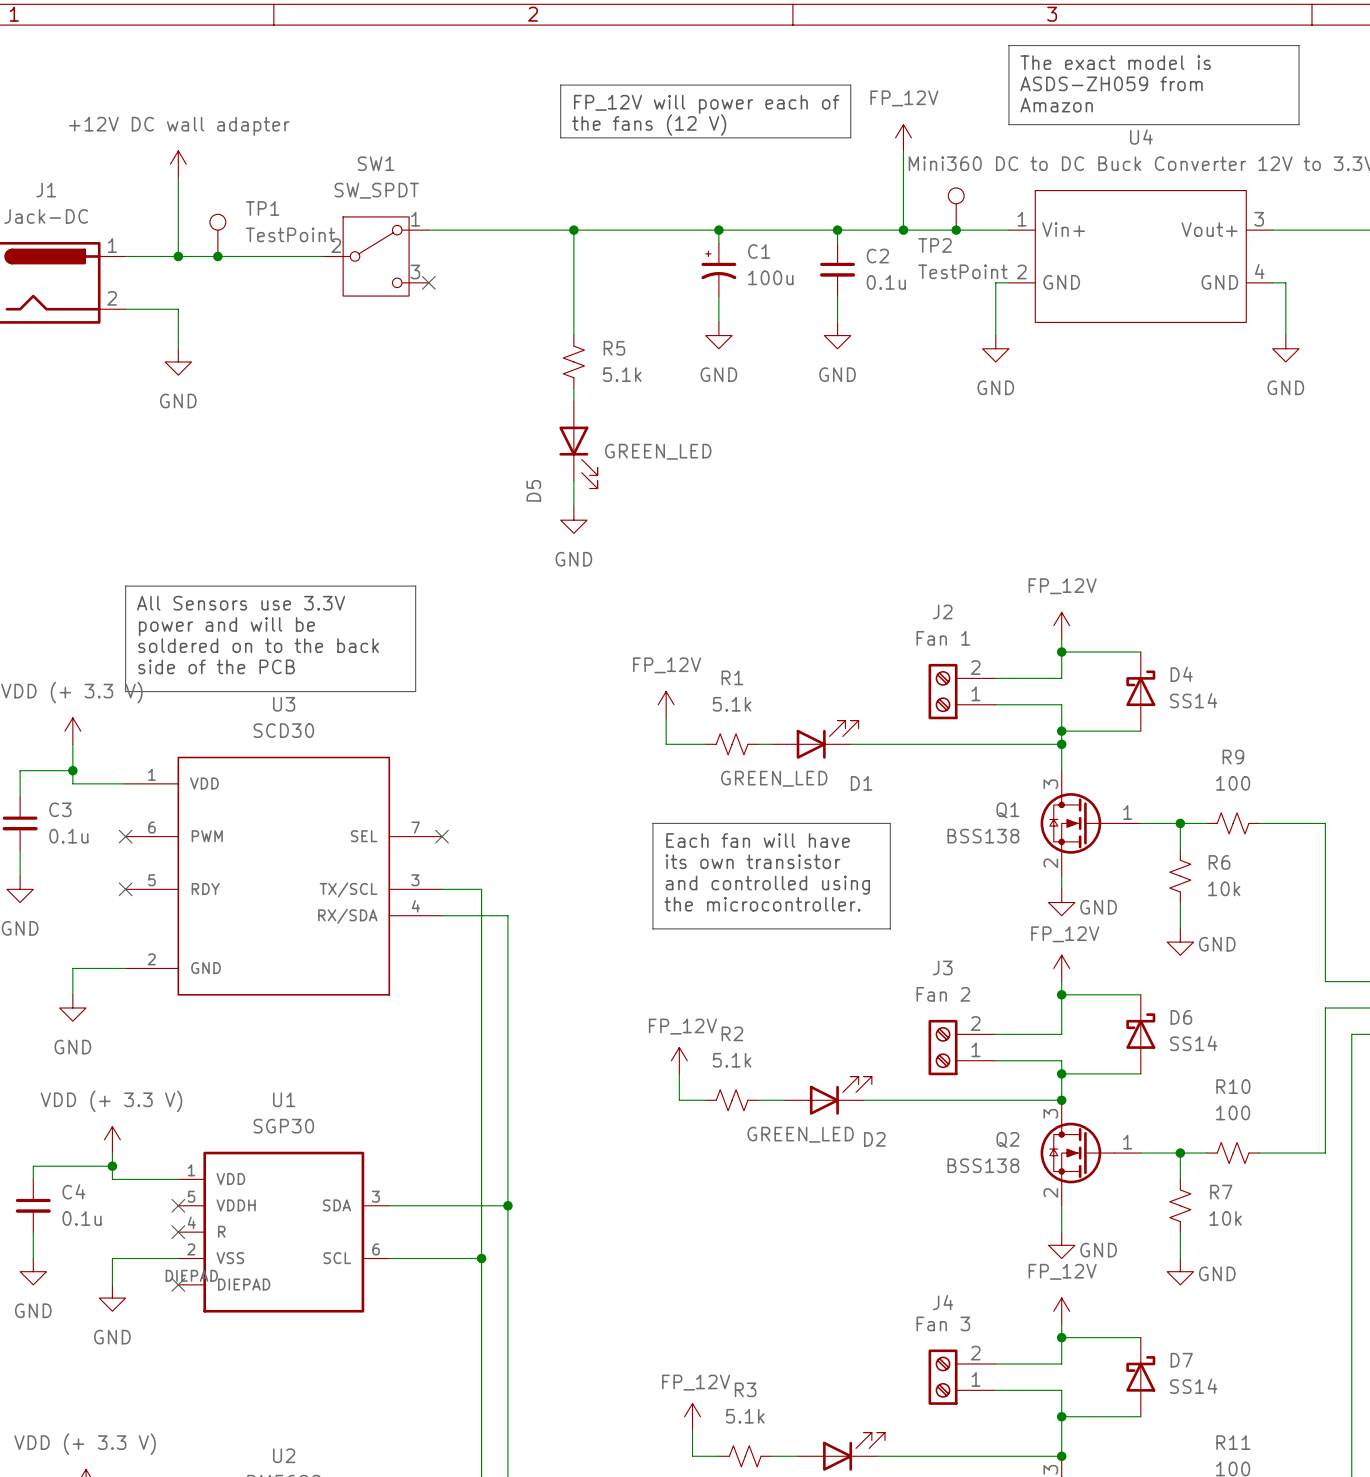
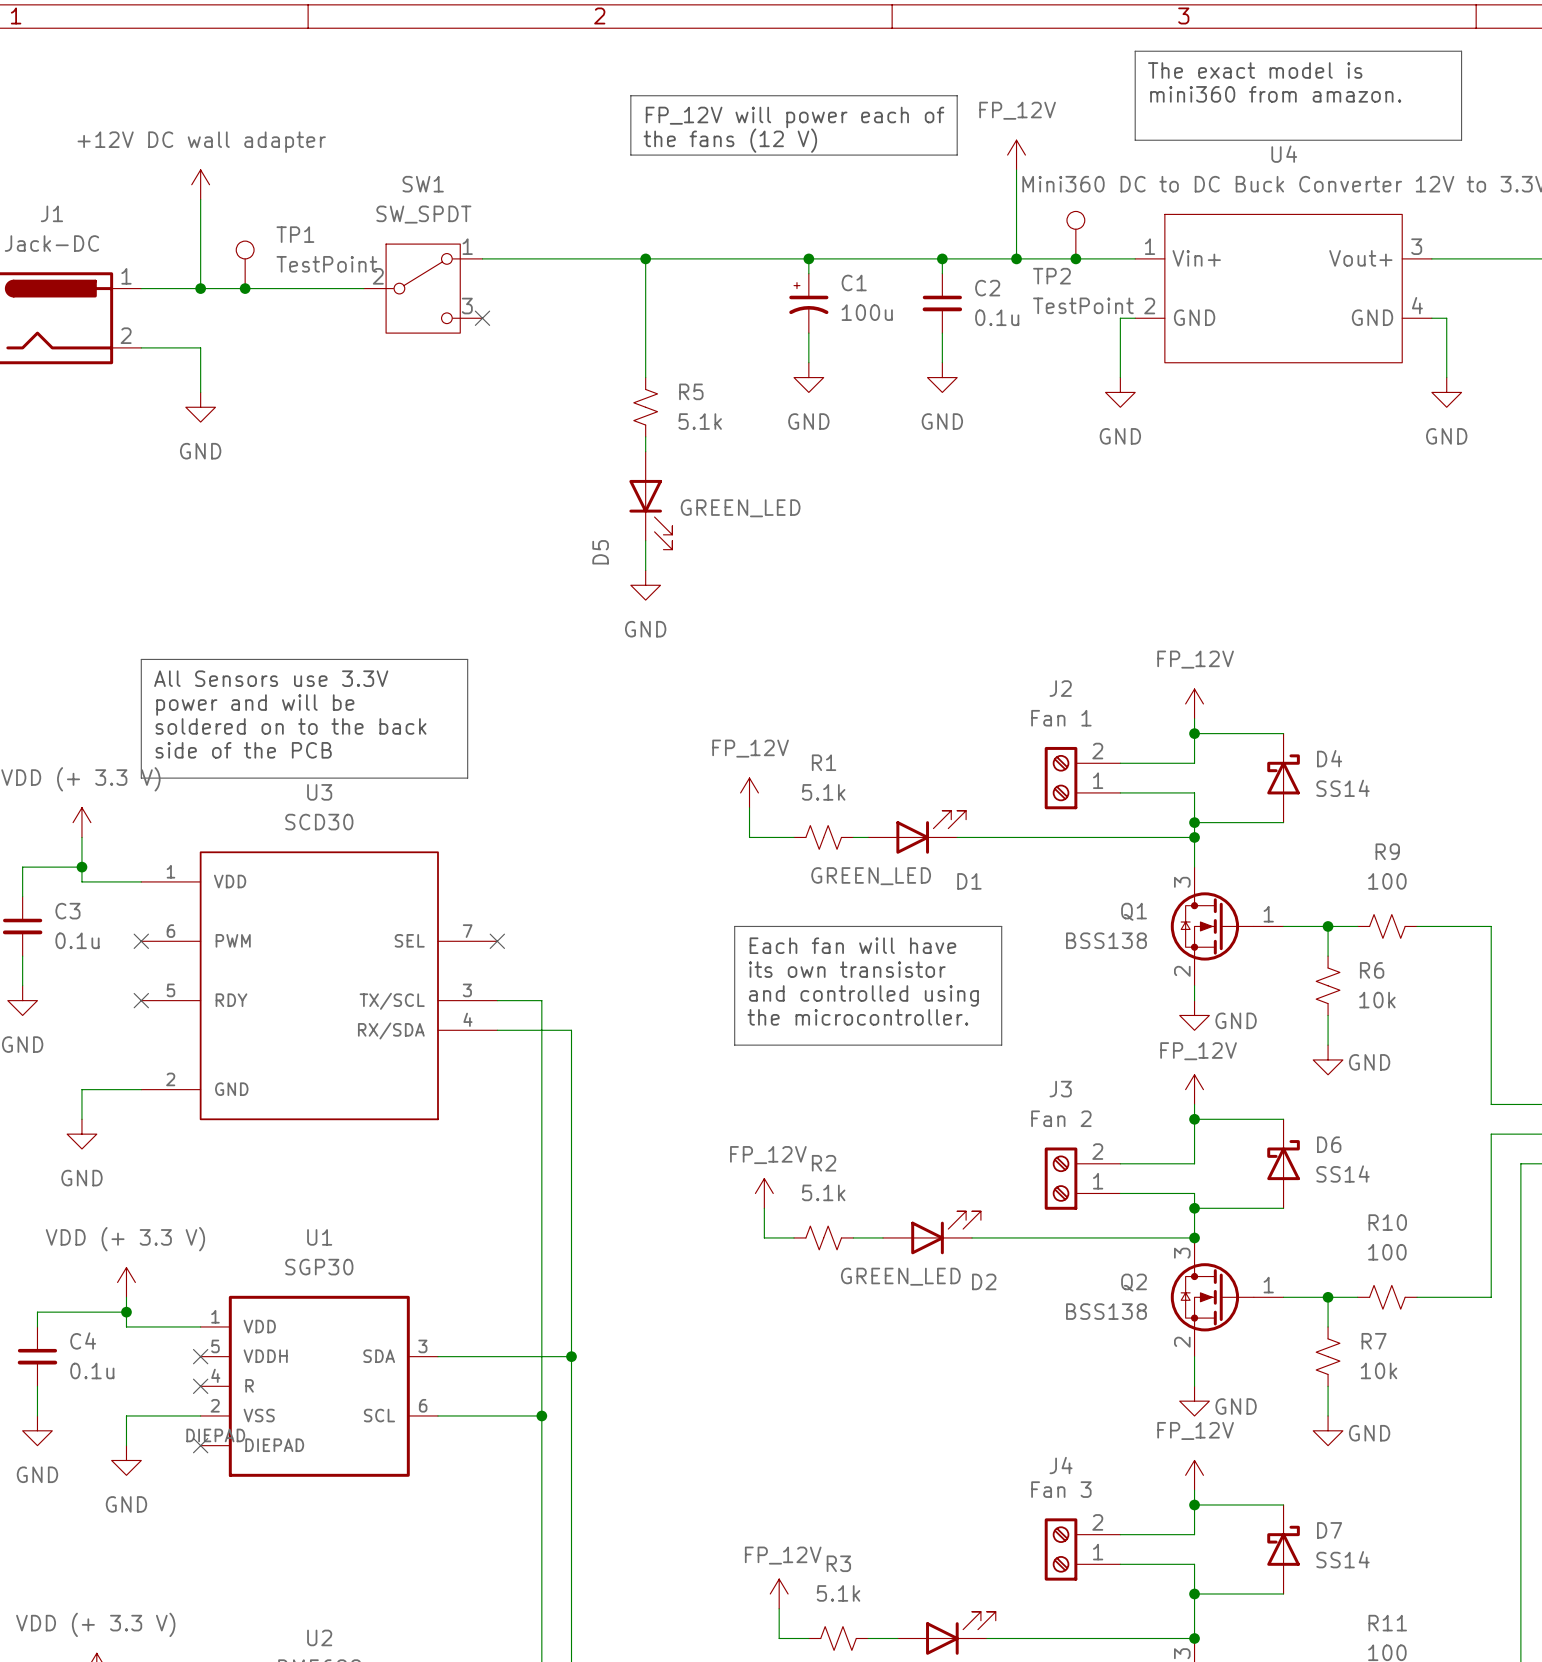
text: ASDS-ZH059 from (1111, 83) -> mini360 from amazon. (1275, 94)
text: Amazon (1056, 105) -> none

